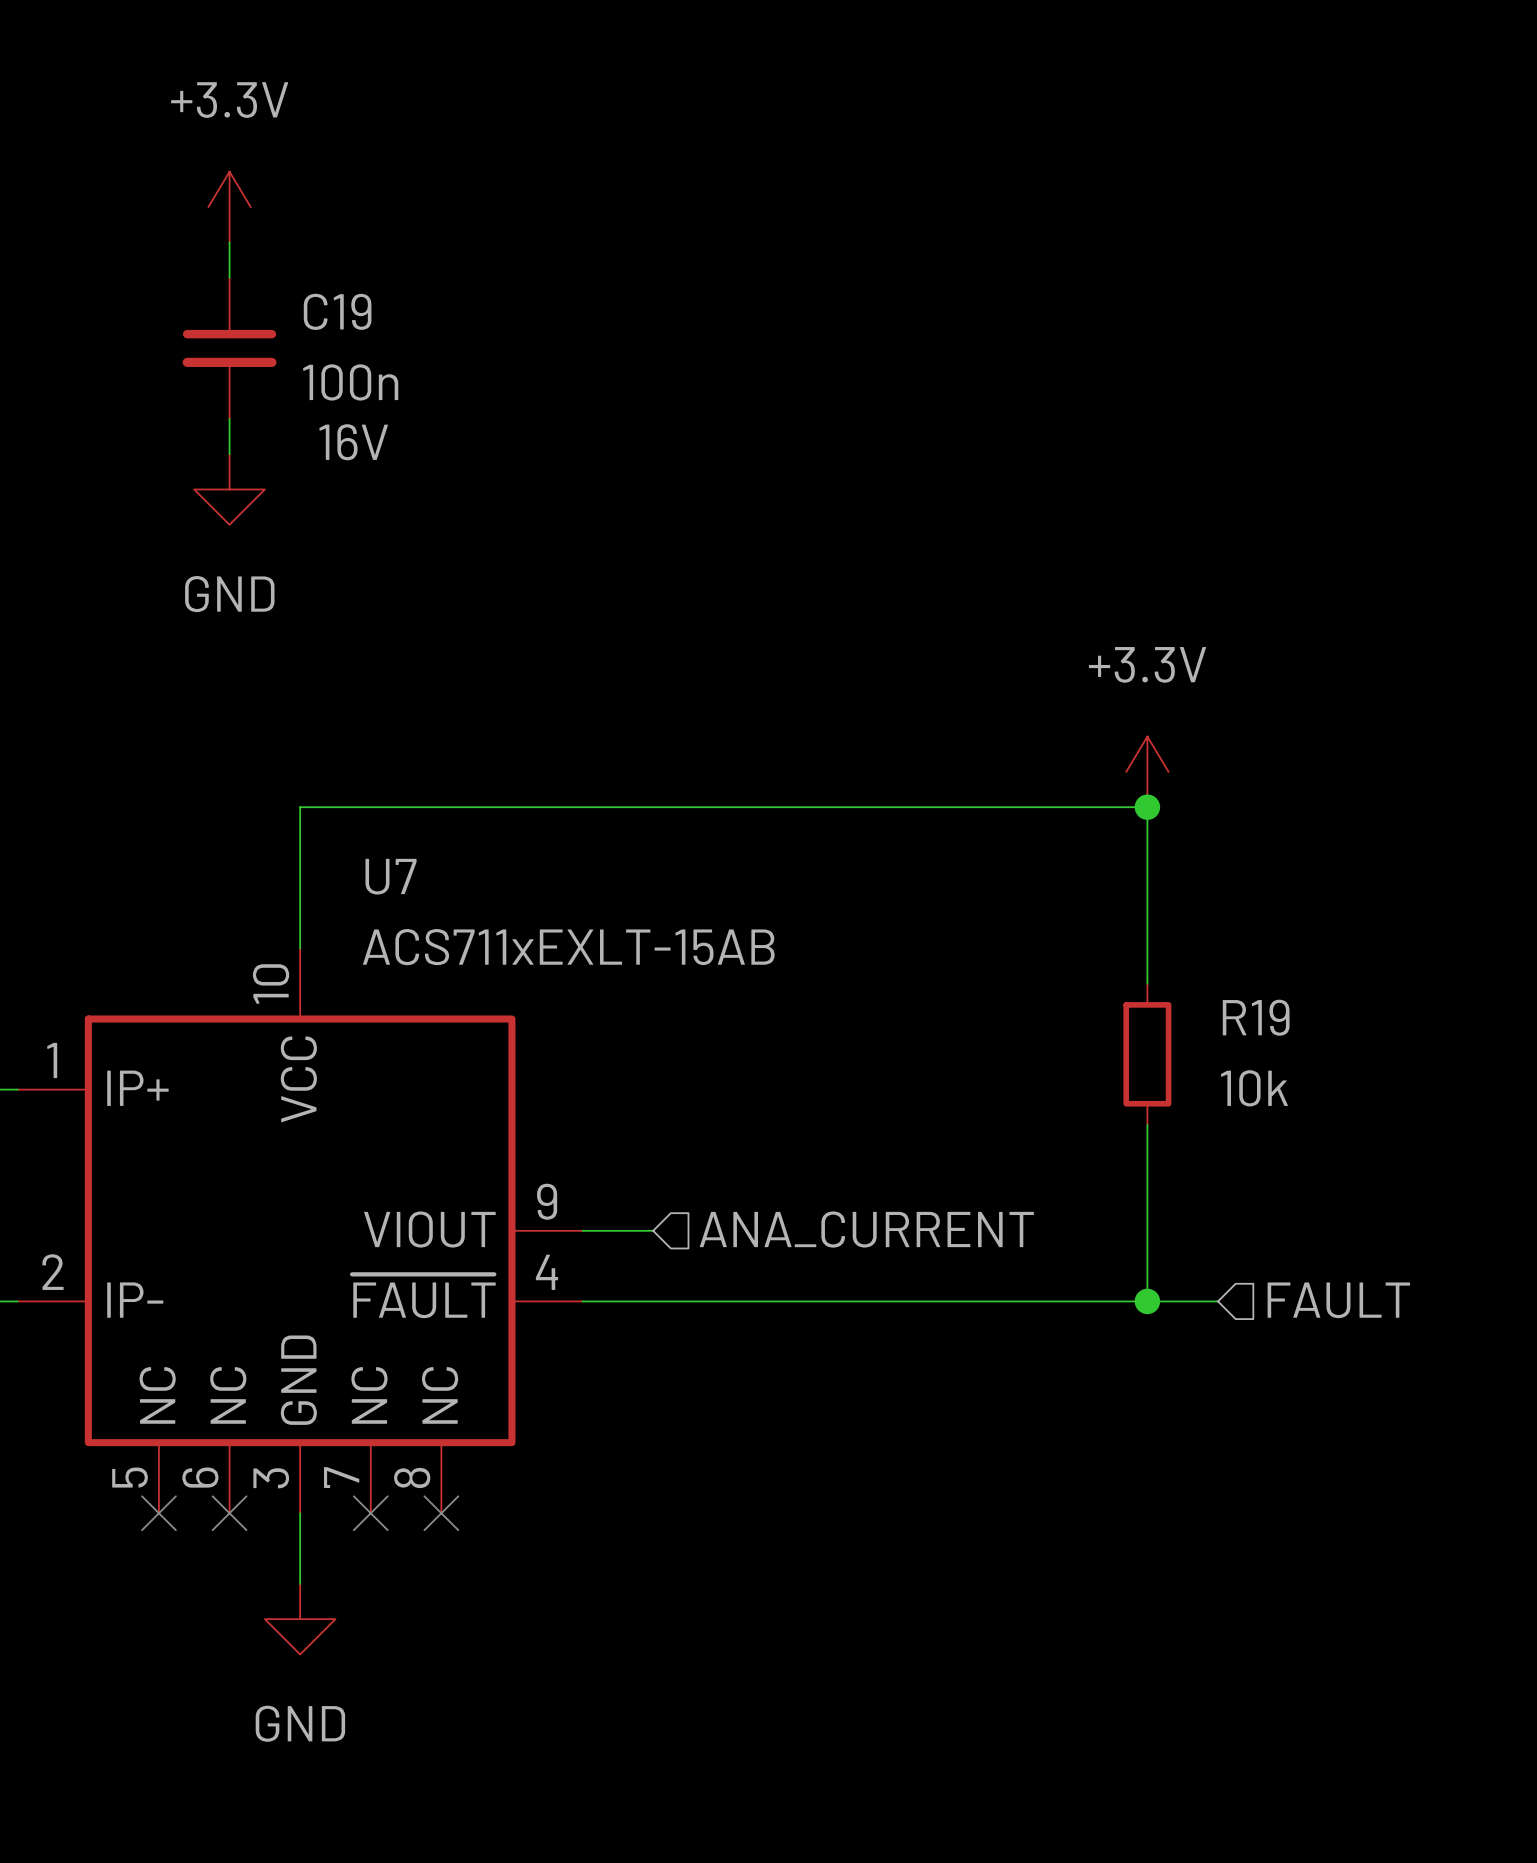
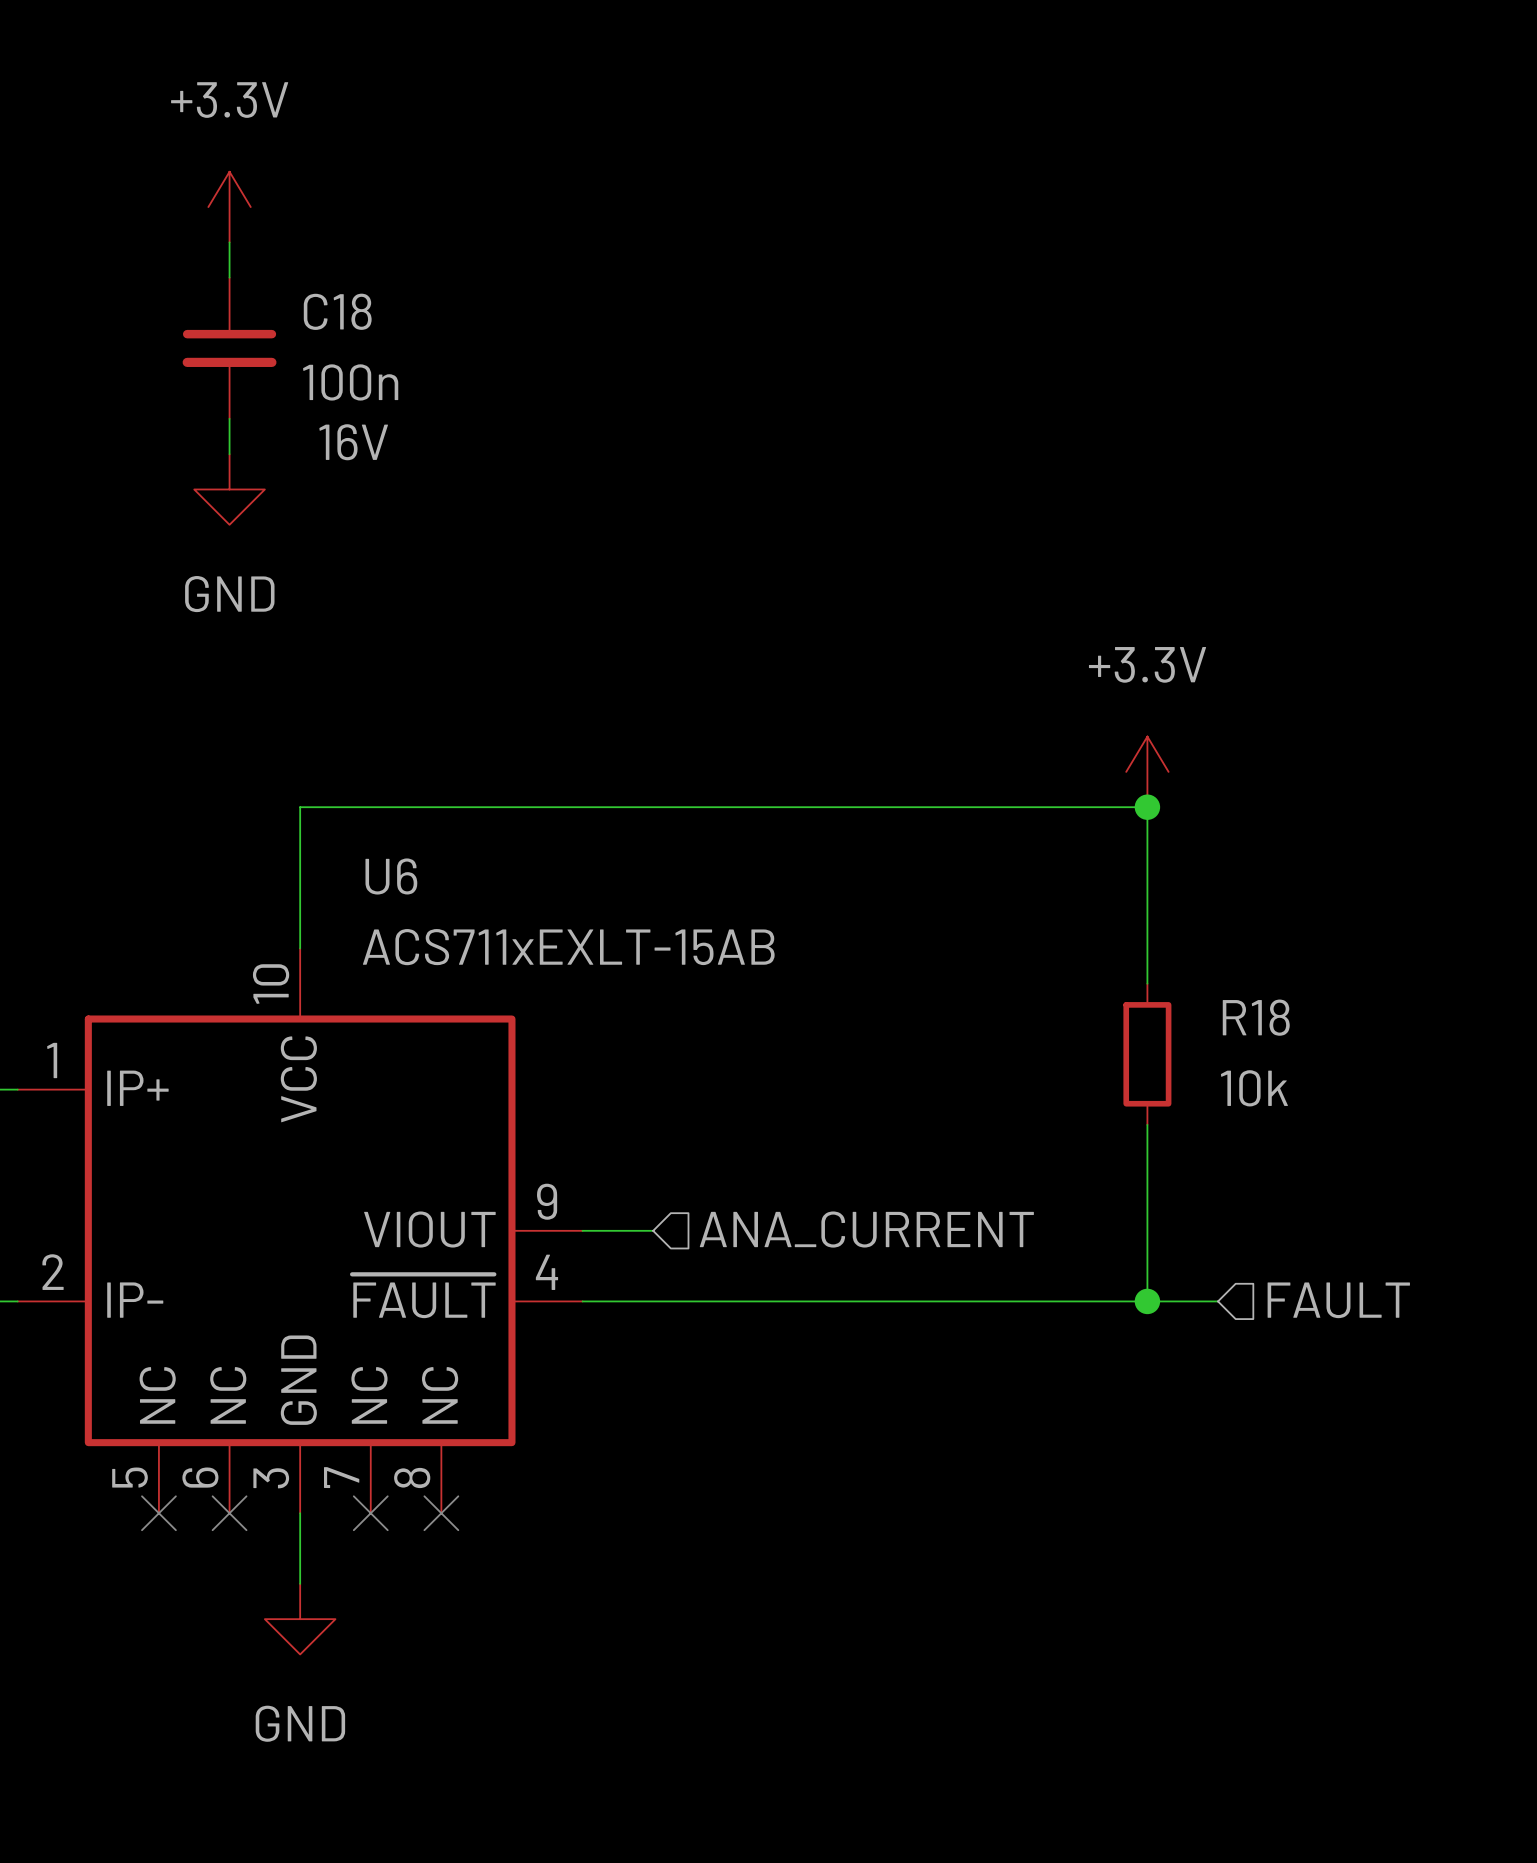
C19 name: C19 (337, 311) -> C18 (337, 311)
U7 name: U7 (391, 876) -> U6 (391, 876)
R19 name: R19 (1256, 1017) -> R18 (1256, 1017)

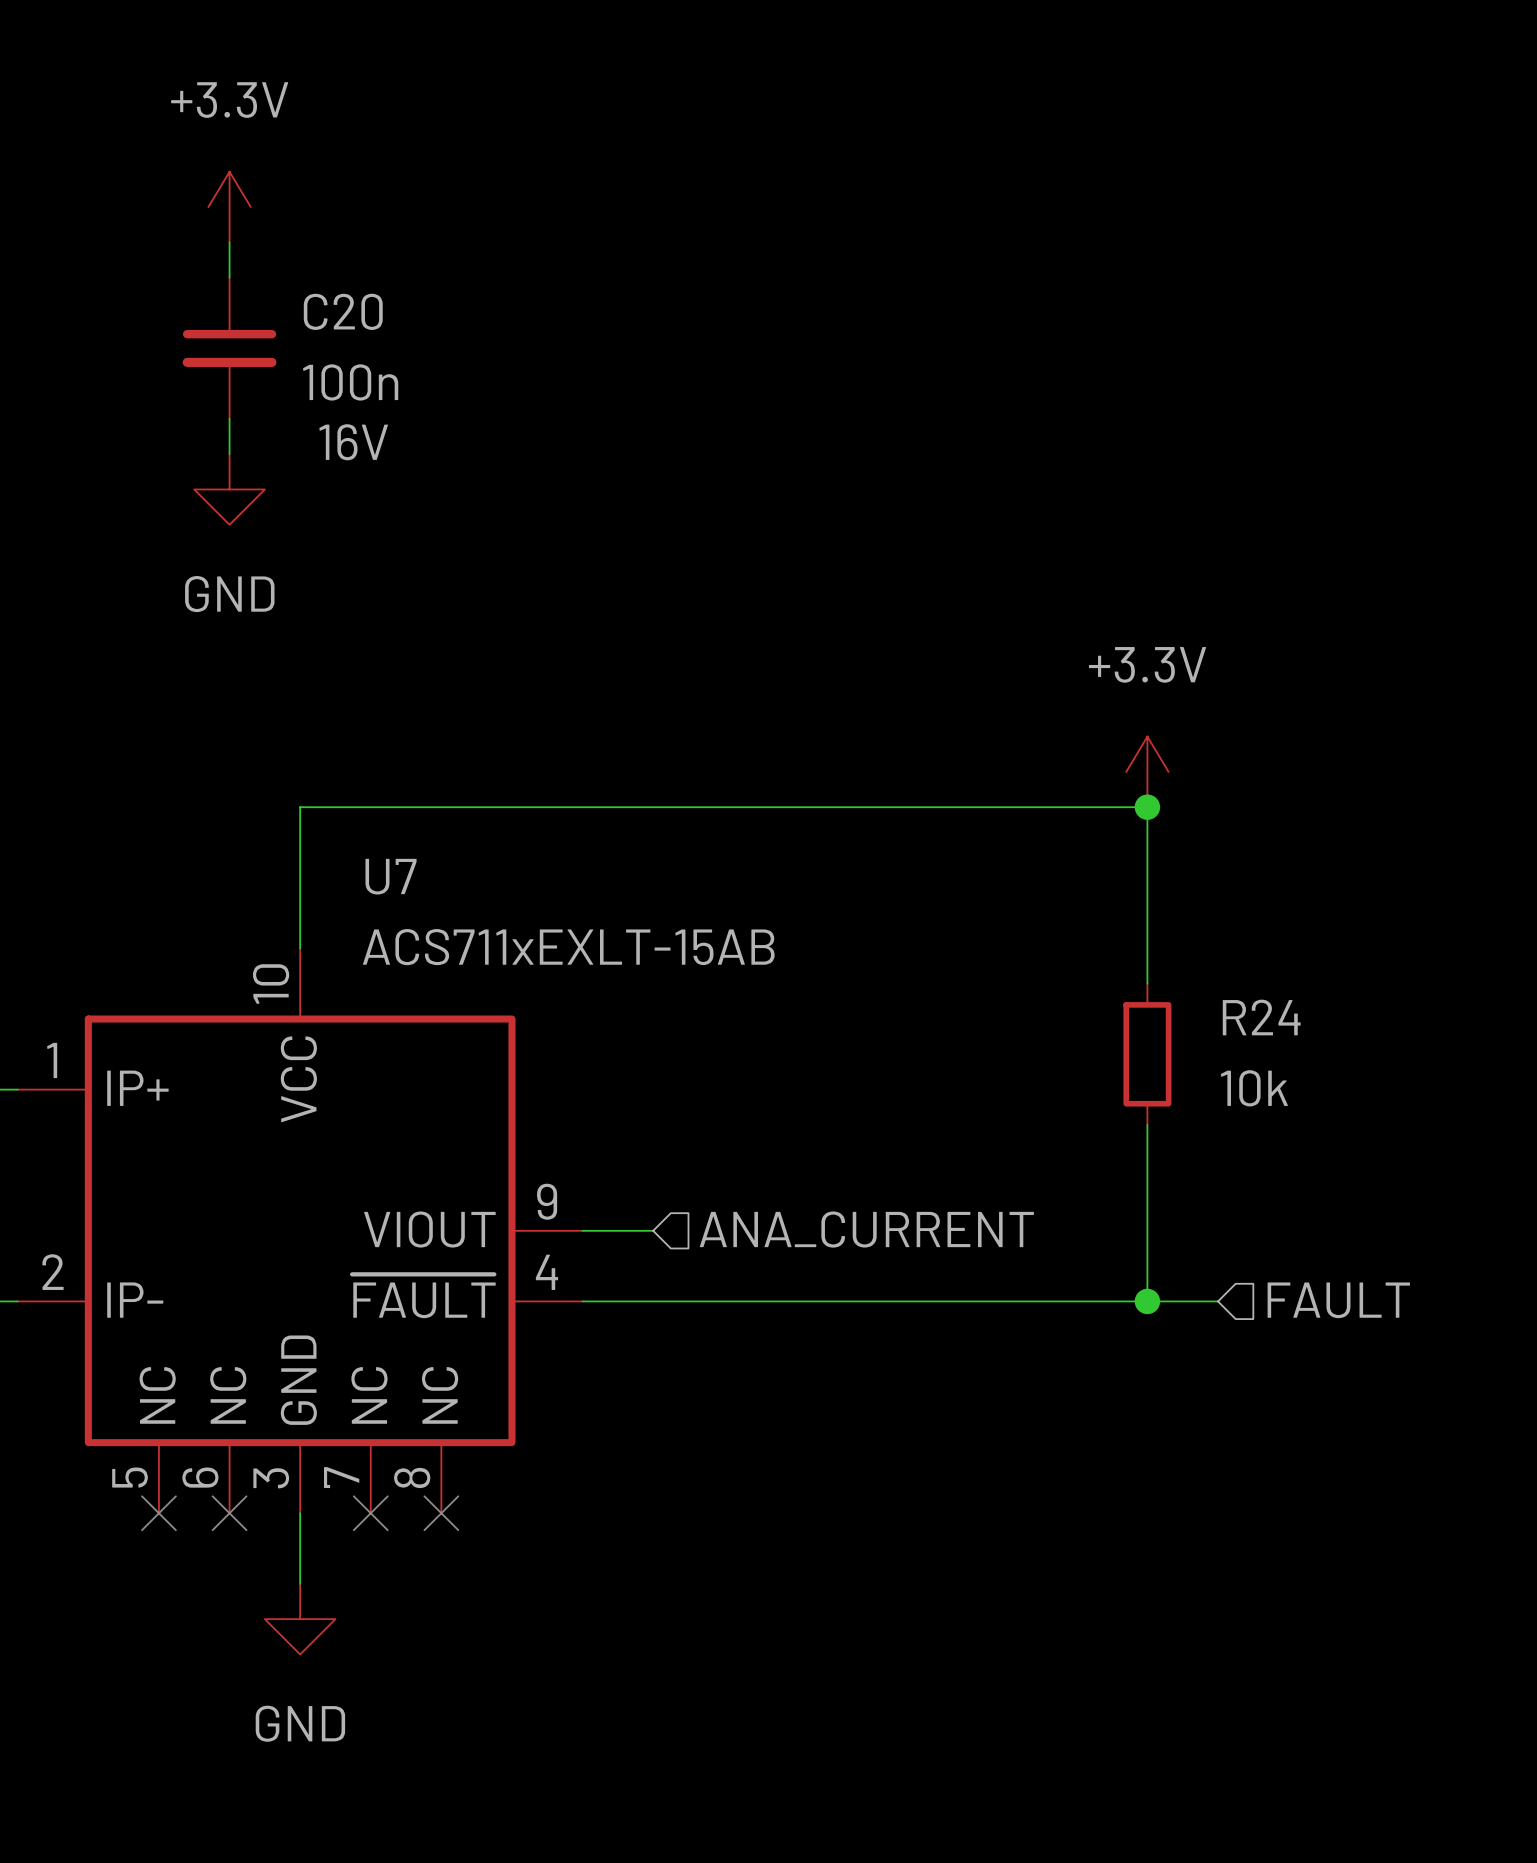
C18 name: C18 (337, 311) -> C20 (343, 311)
U6 name: U6 (391, 876) -> U7 (391, 876)
R18 name: R18 (1256, 1017) -> R24 (1261, 1017)

